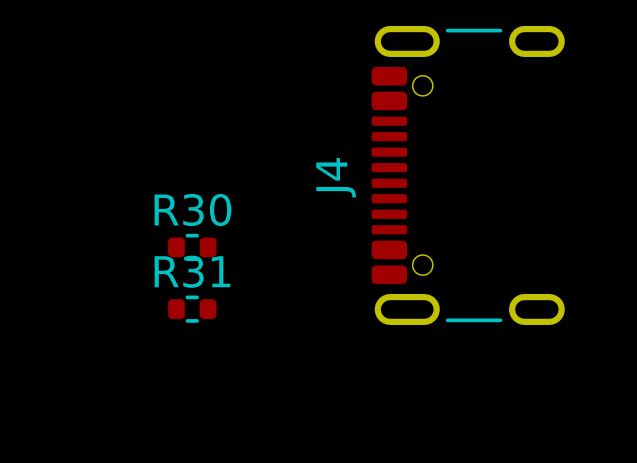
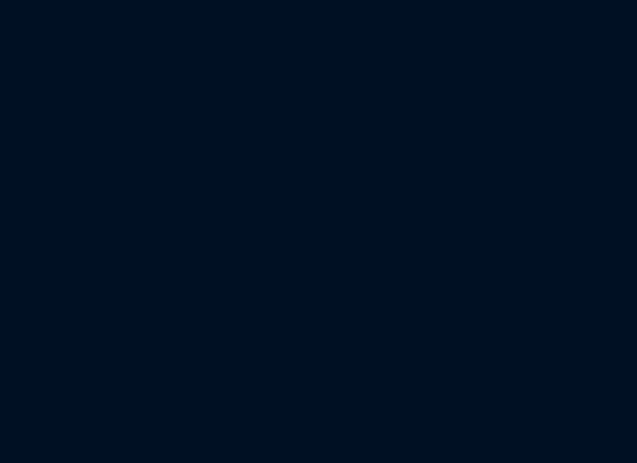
J4: (468, 175) -> none
R30: (192, 247) -> none
R31: (192, 309) -> none

